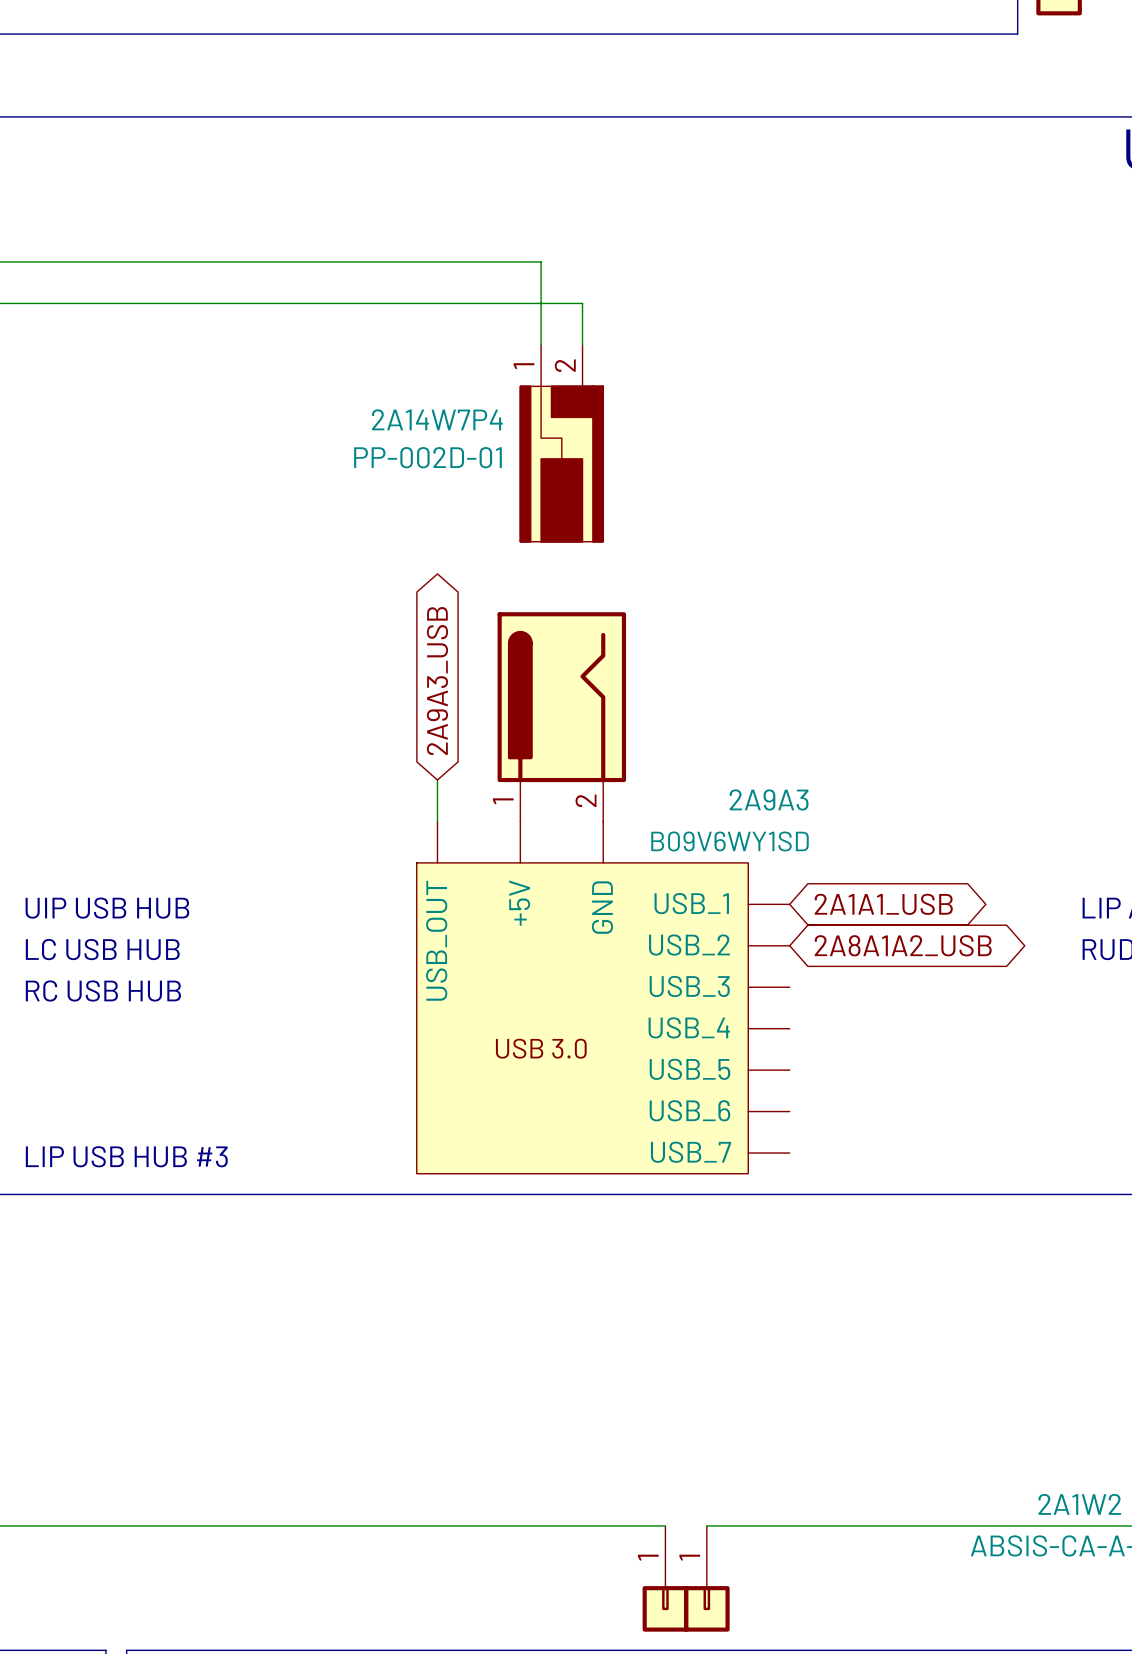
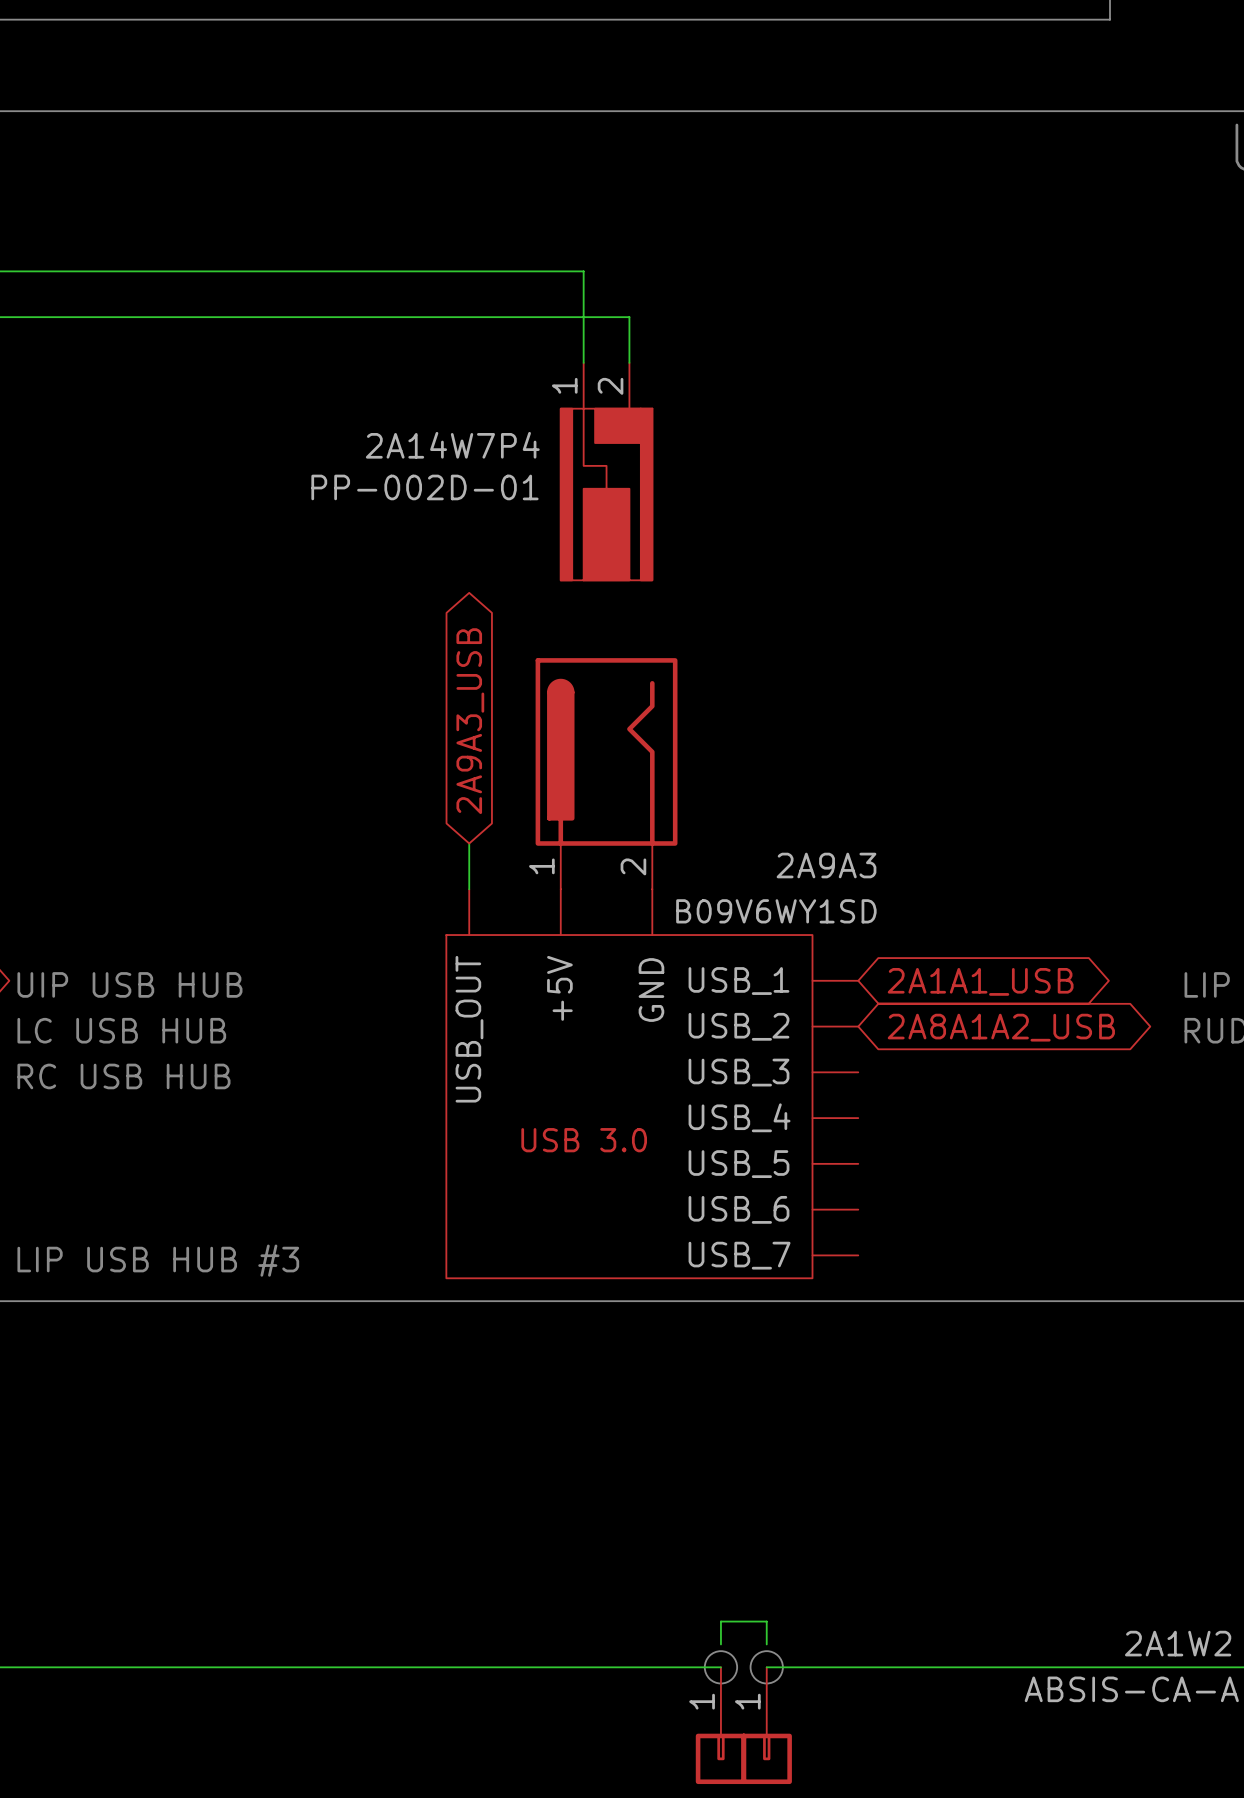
wire: none -> (720, 1644) (720, 1621) (766, 1621) (766, 1644)
drawing: none -> [704, 1651, 783, 1684]

